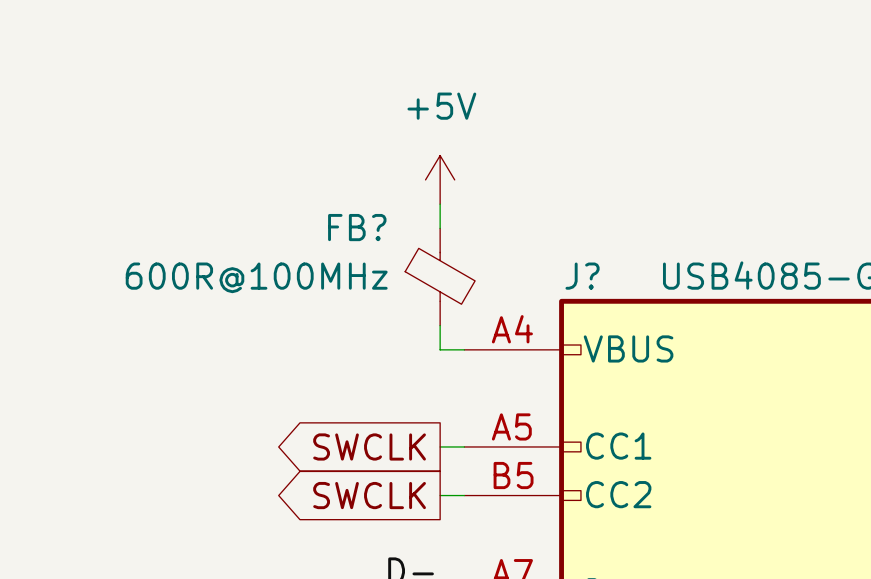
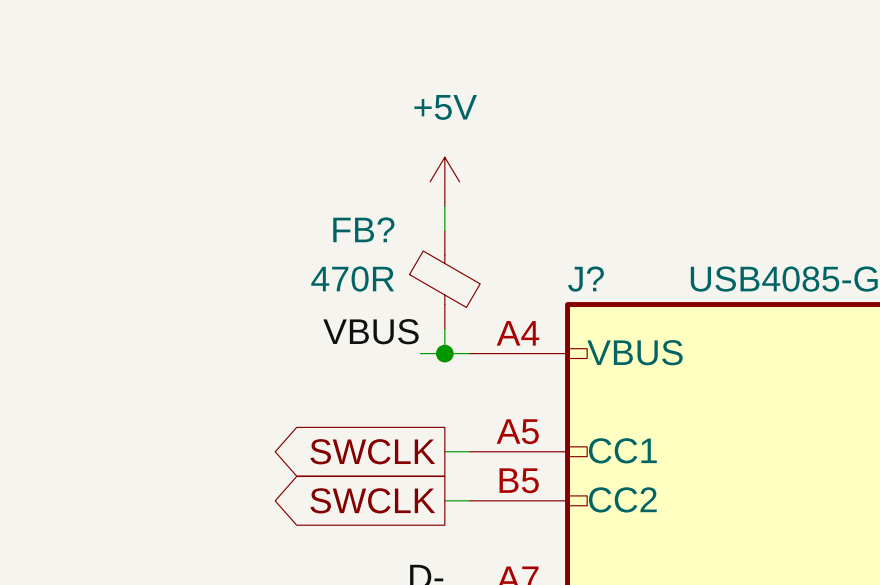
FB? value: 600R@100MHz (256, 277) -> 470R (352, 279)
label: none -> VBUS (370, 331)
wire: none -> (420, 353) (444, 353)
junction: none -> (444, 353)

